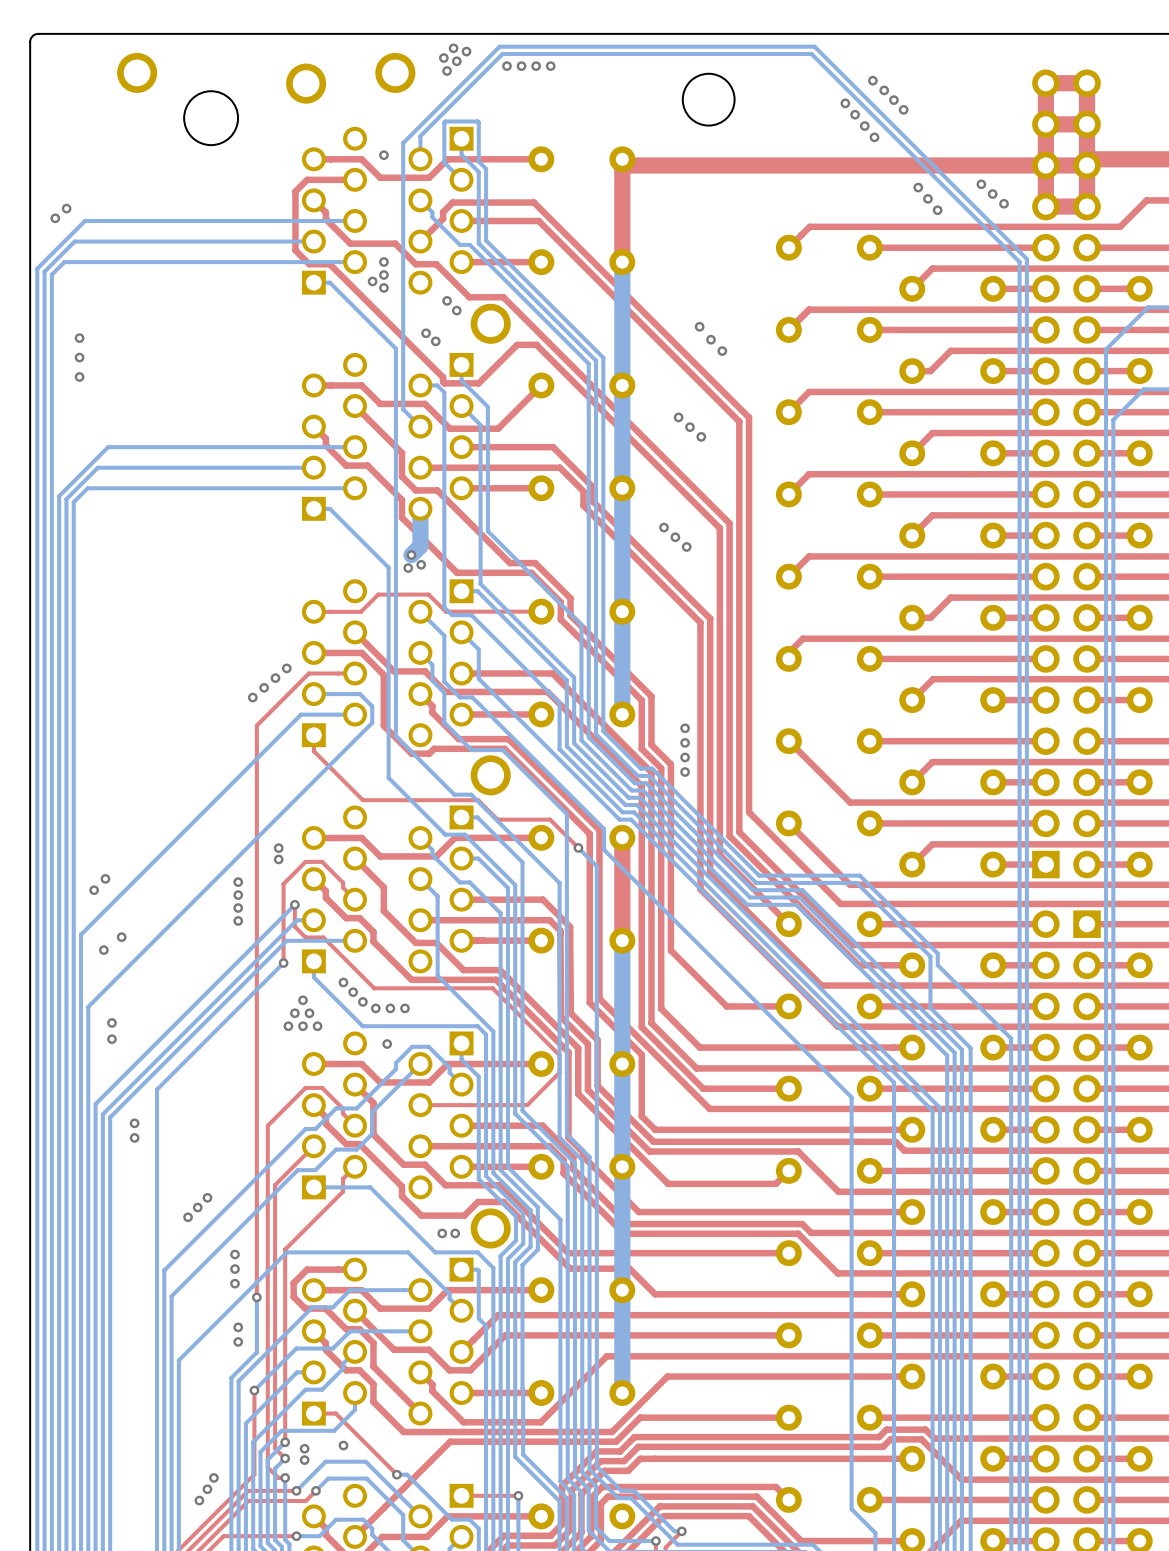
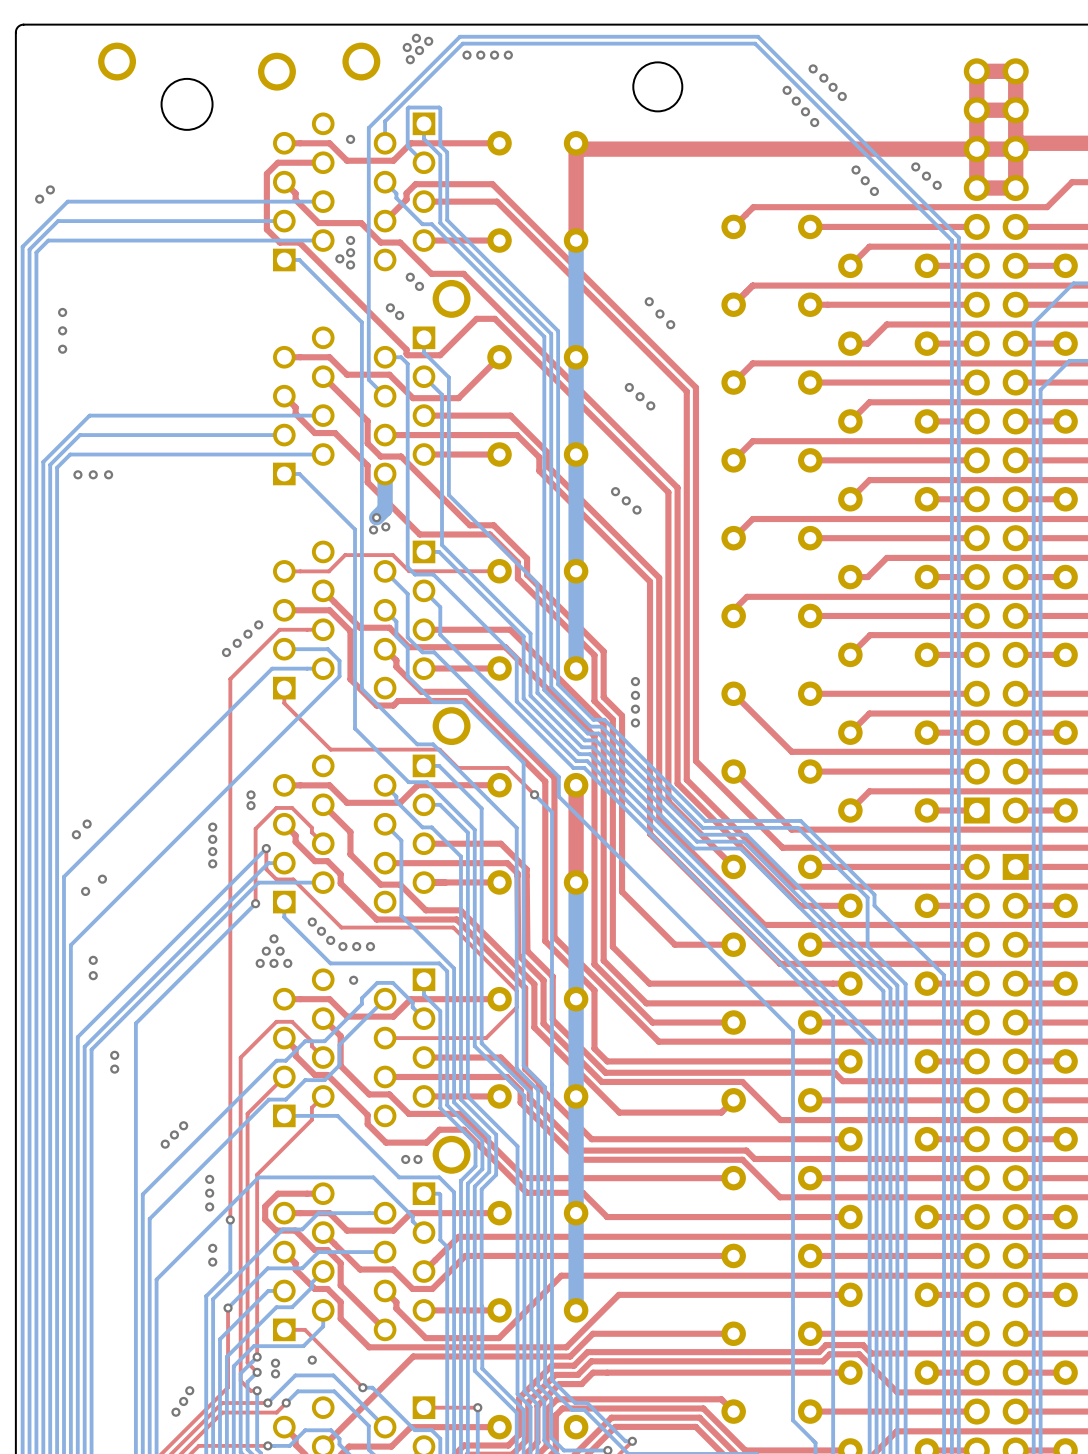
via: none -> (77, 474)
via: none -> (93, 474)
via: none -> (108, 474)

